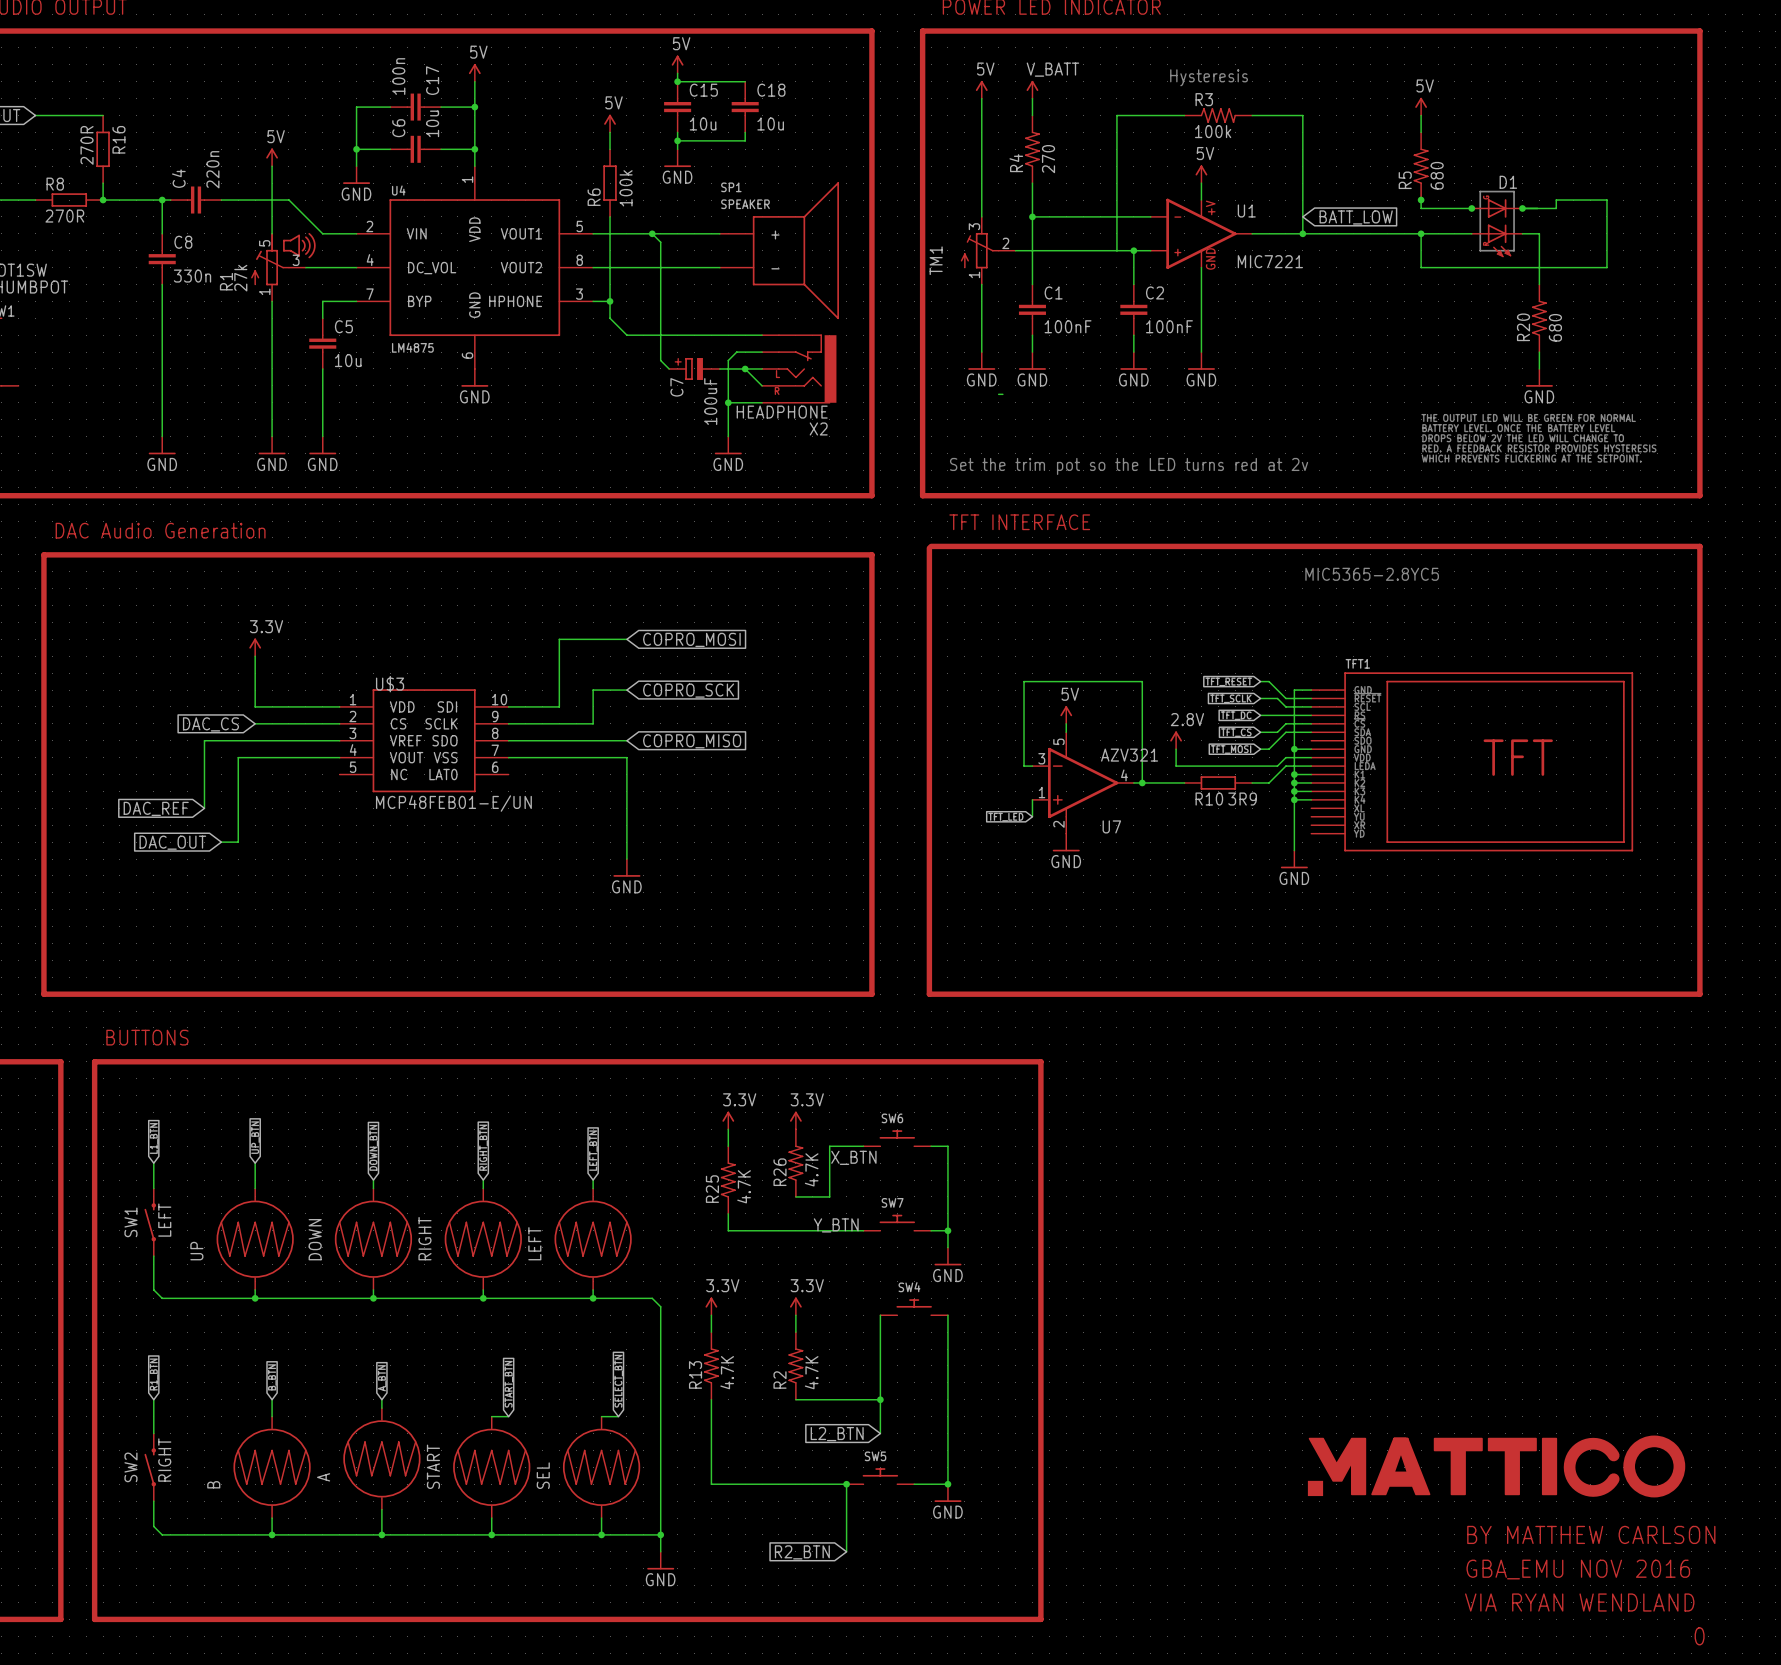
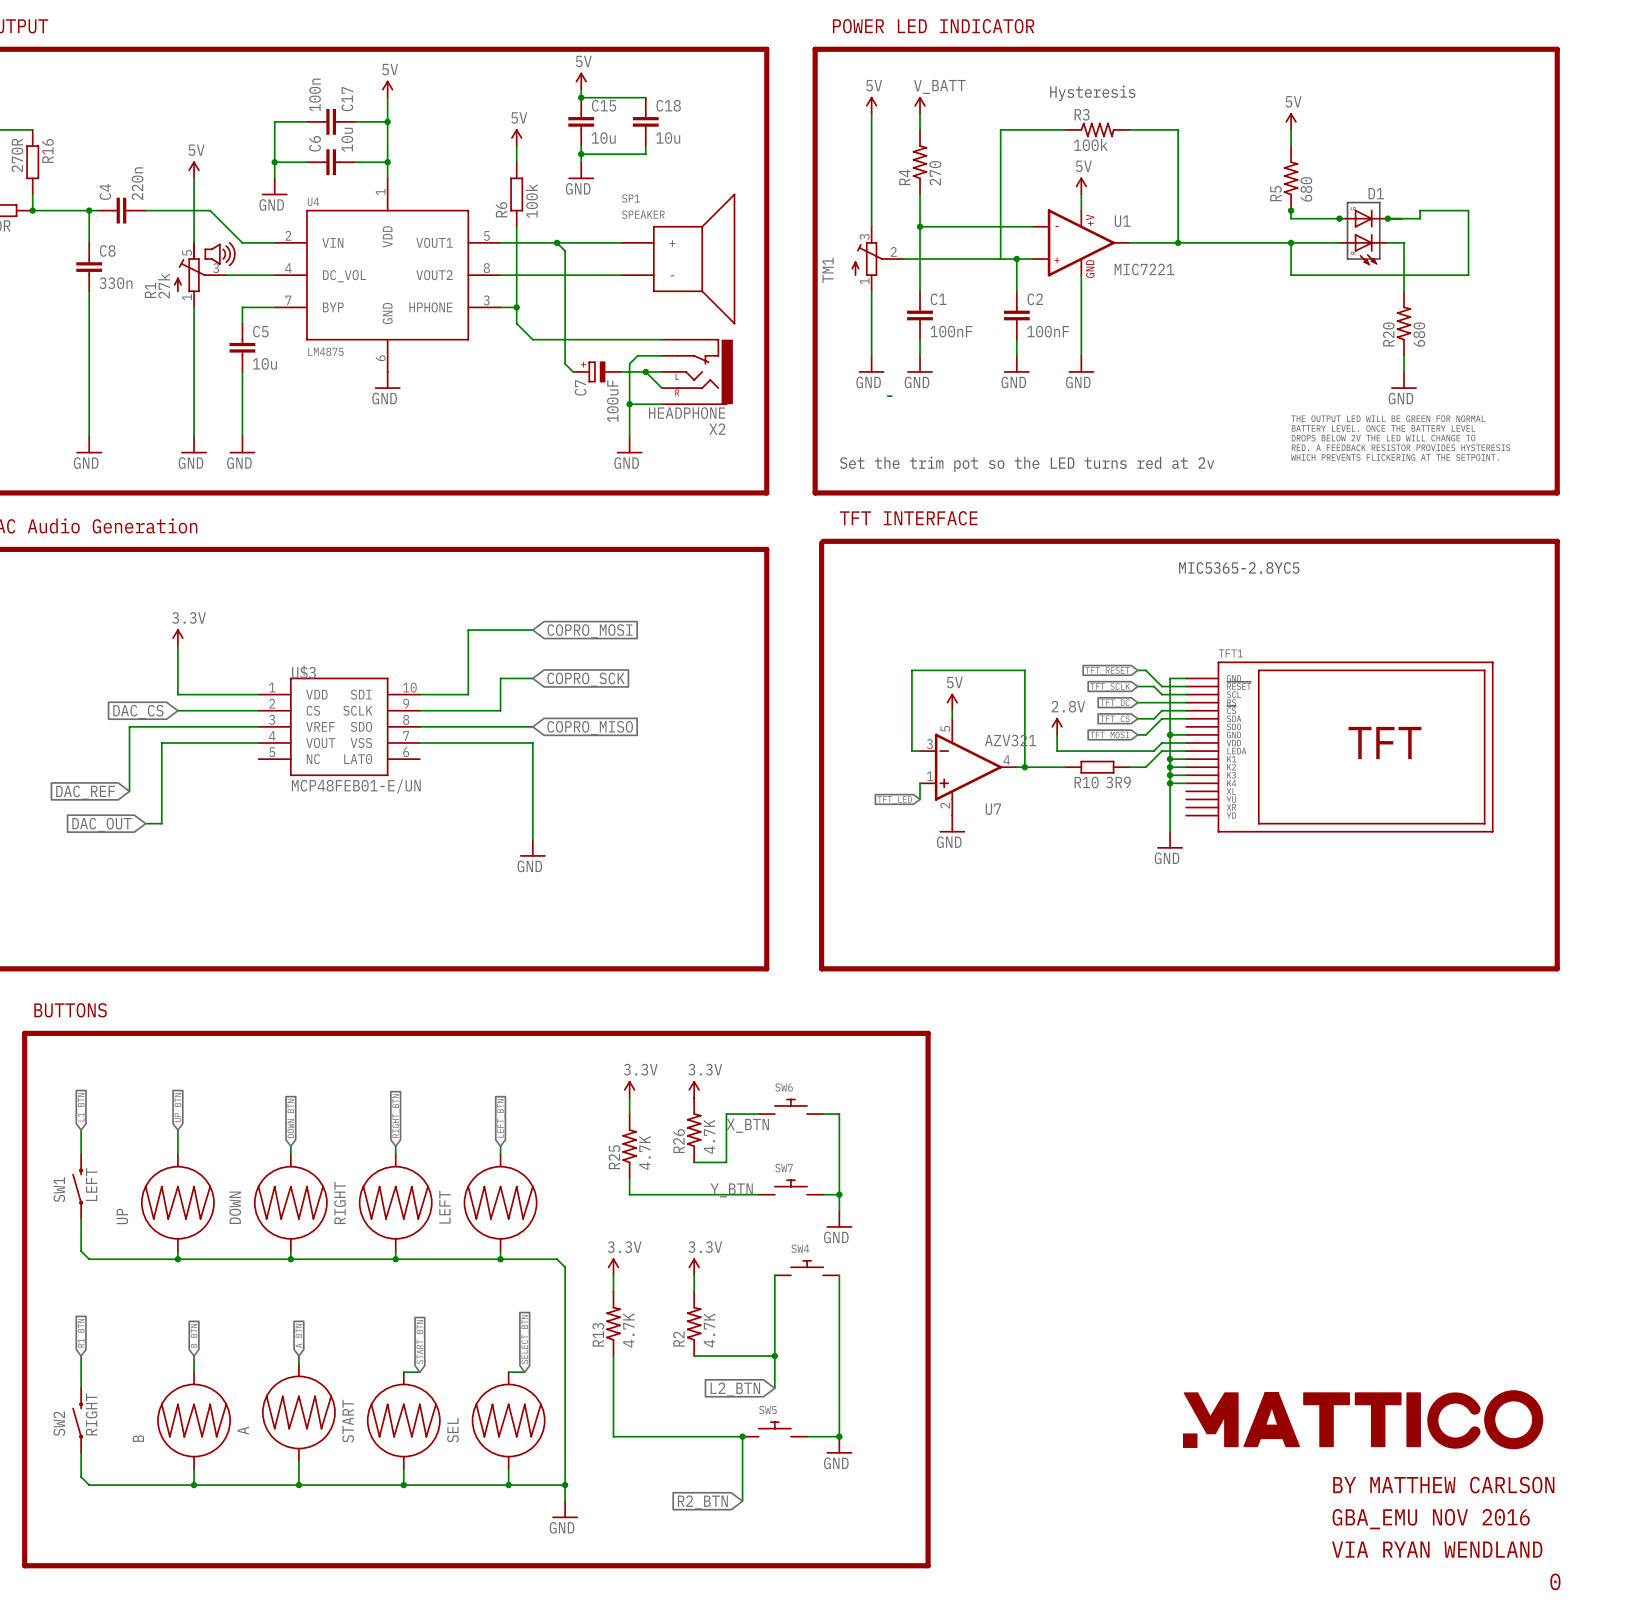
global label: BATT_LOW (1356, 217) -> none

